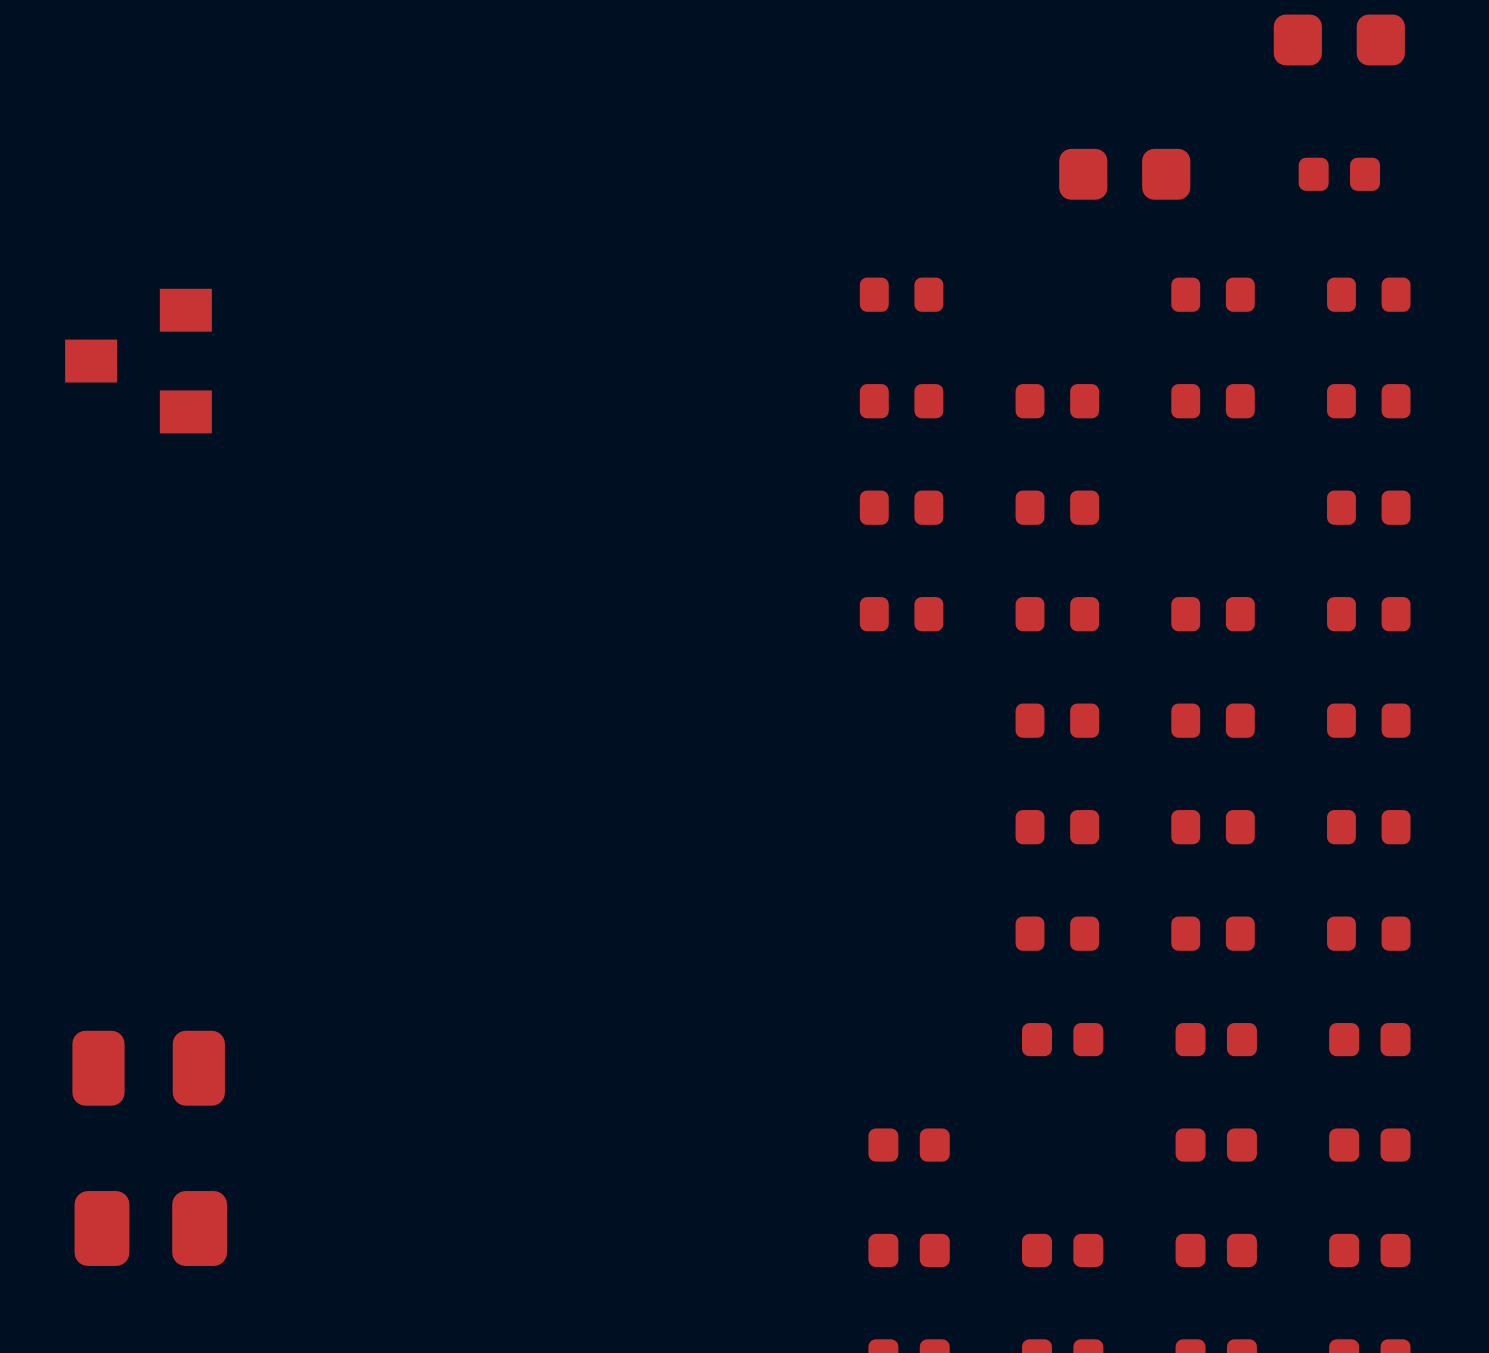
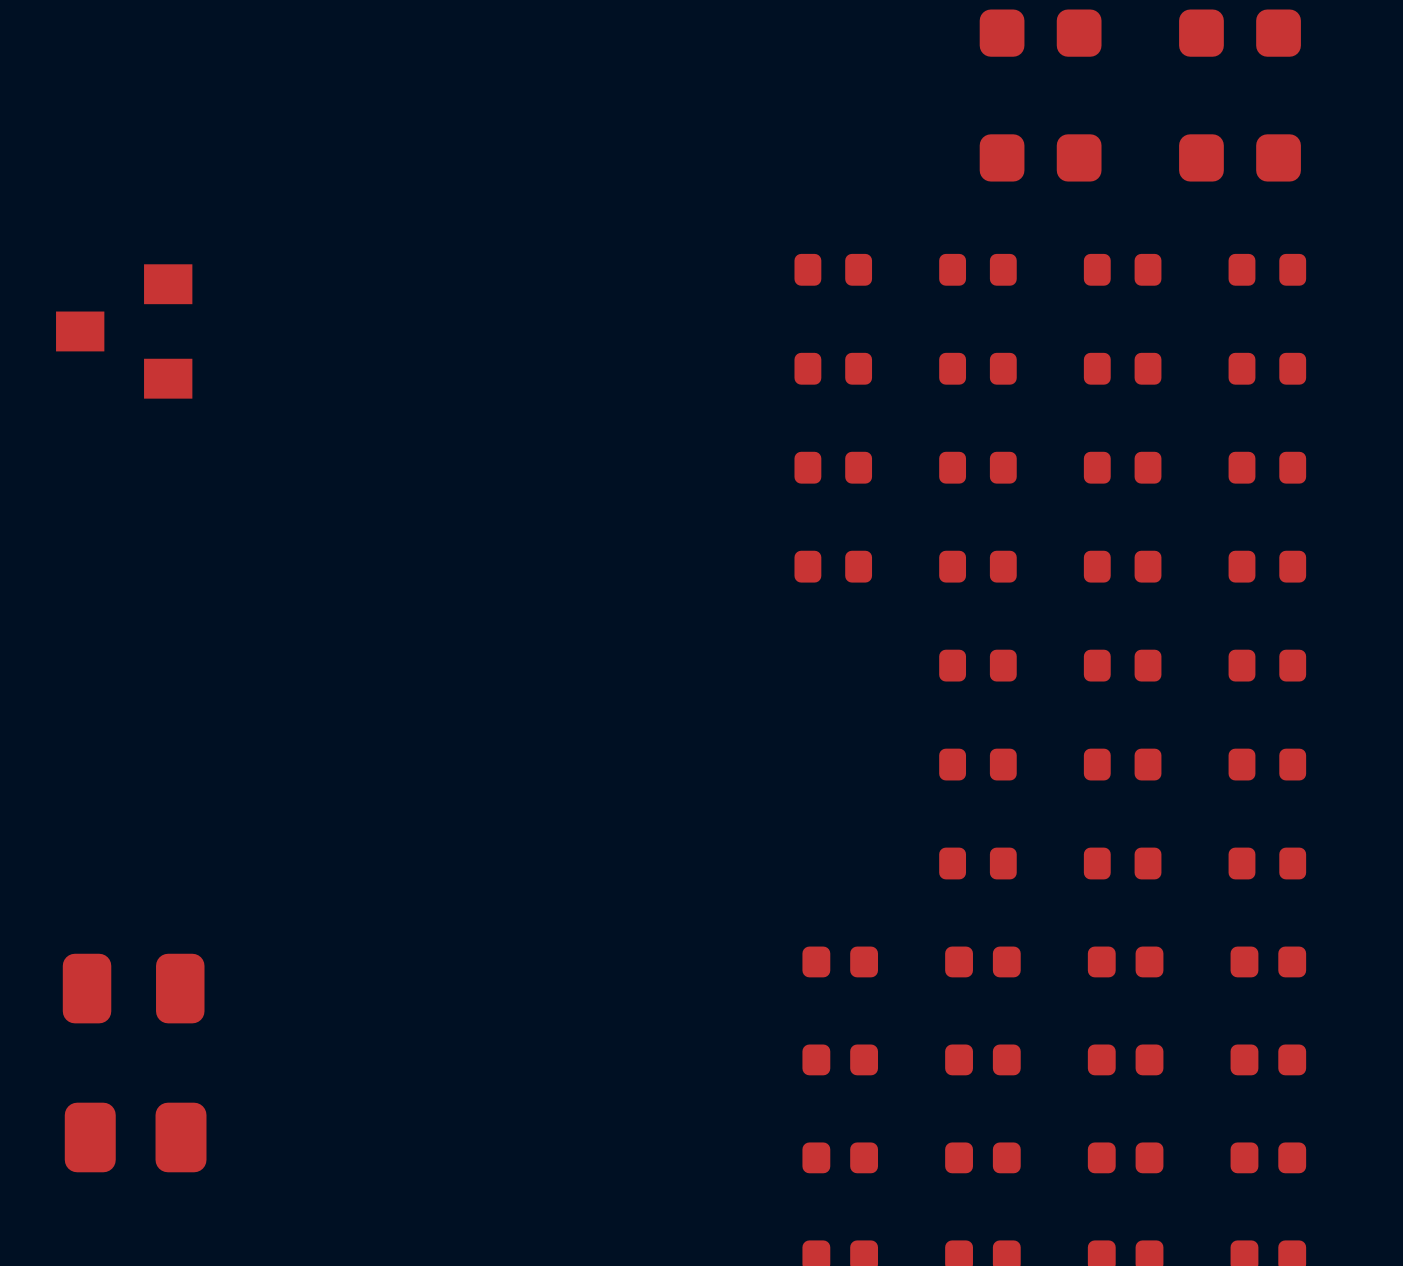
part: none -> (1040, 33)
part footprint: [1298, 157, 1380, 191] -> [1179, 134, 1301, 182]
part: none -> (977, 269)
part: none -> (1122, 467)
part: none -> (840, 961)
part: none -> (982, 1059)

